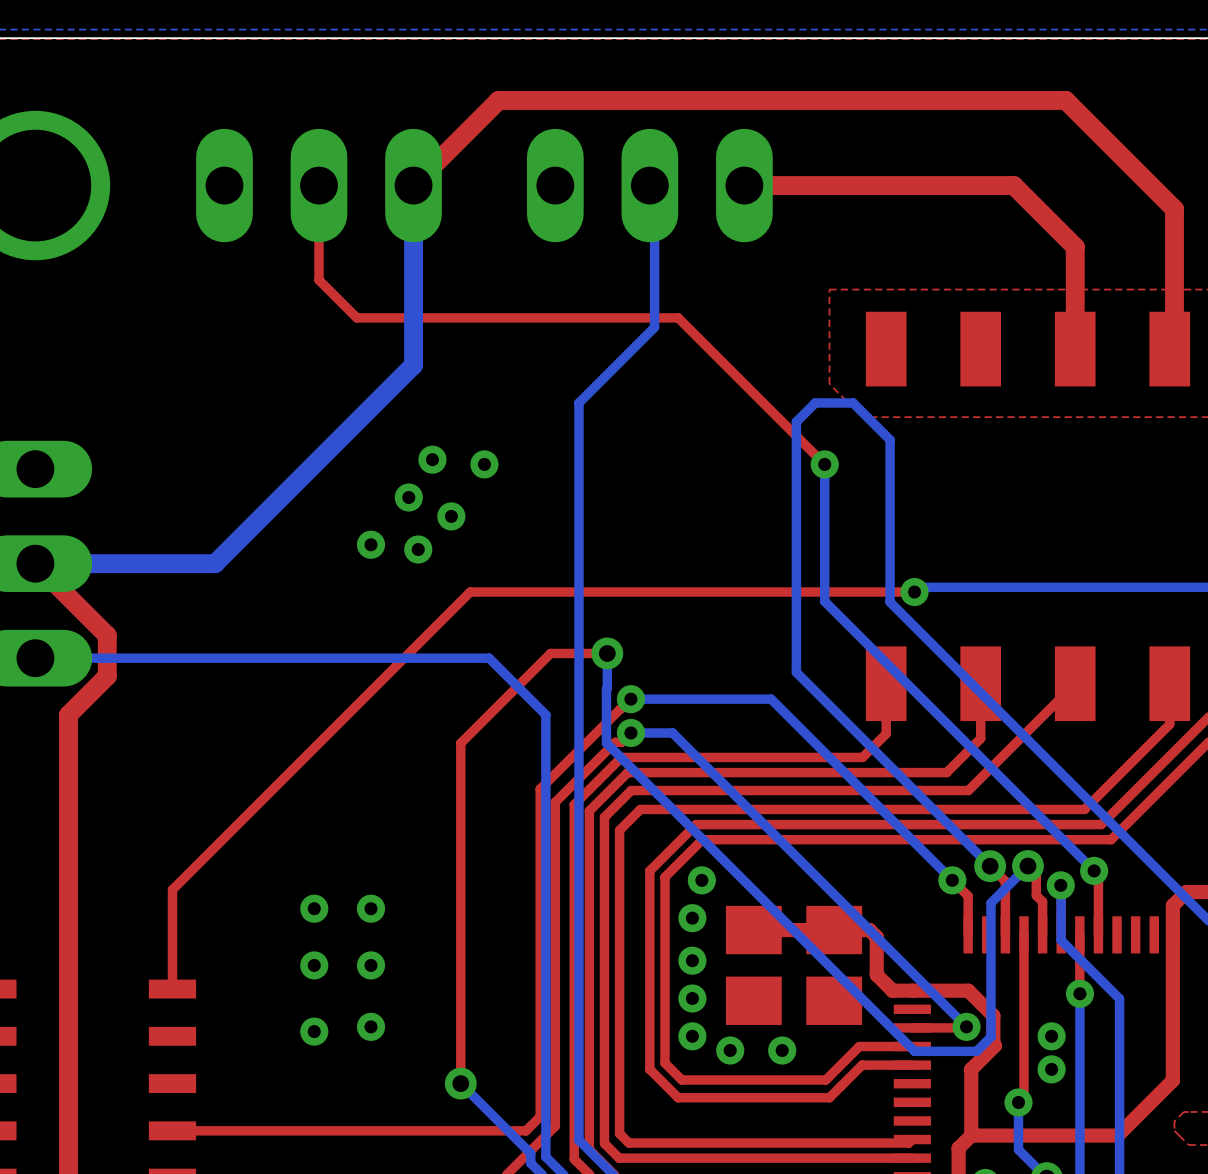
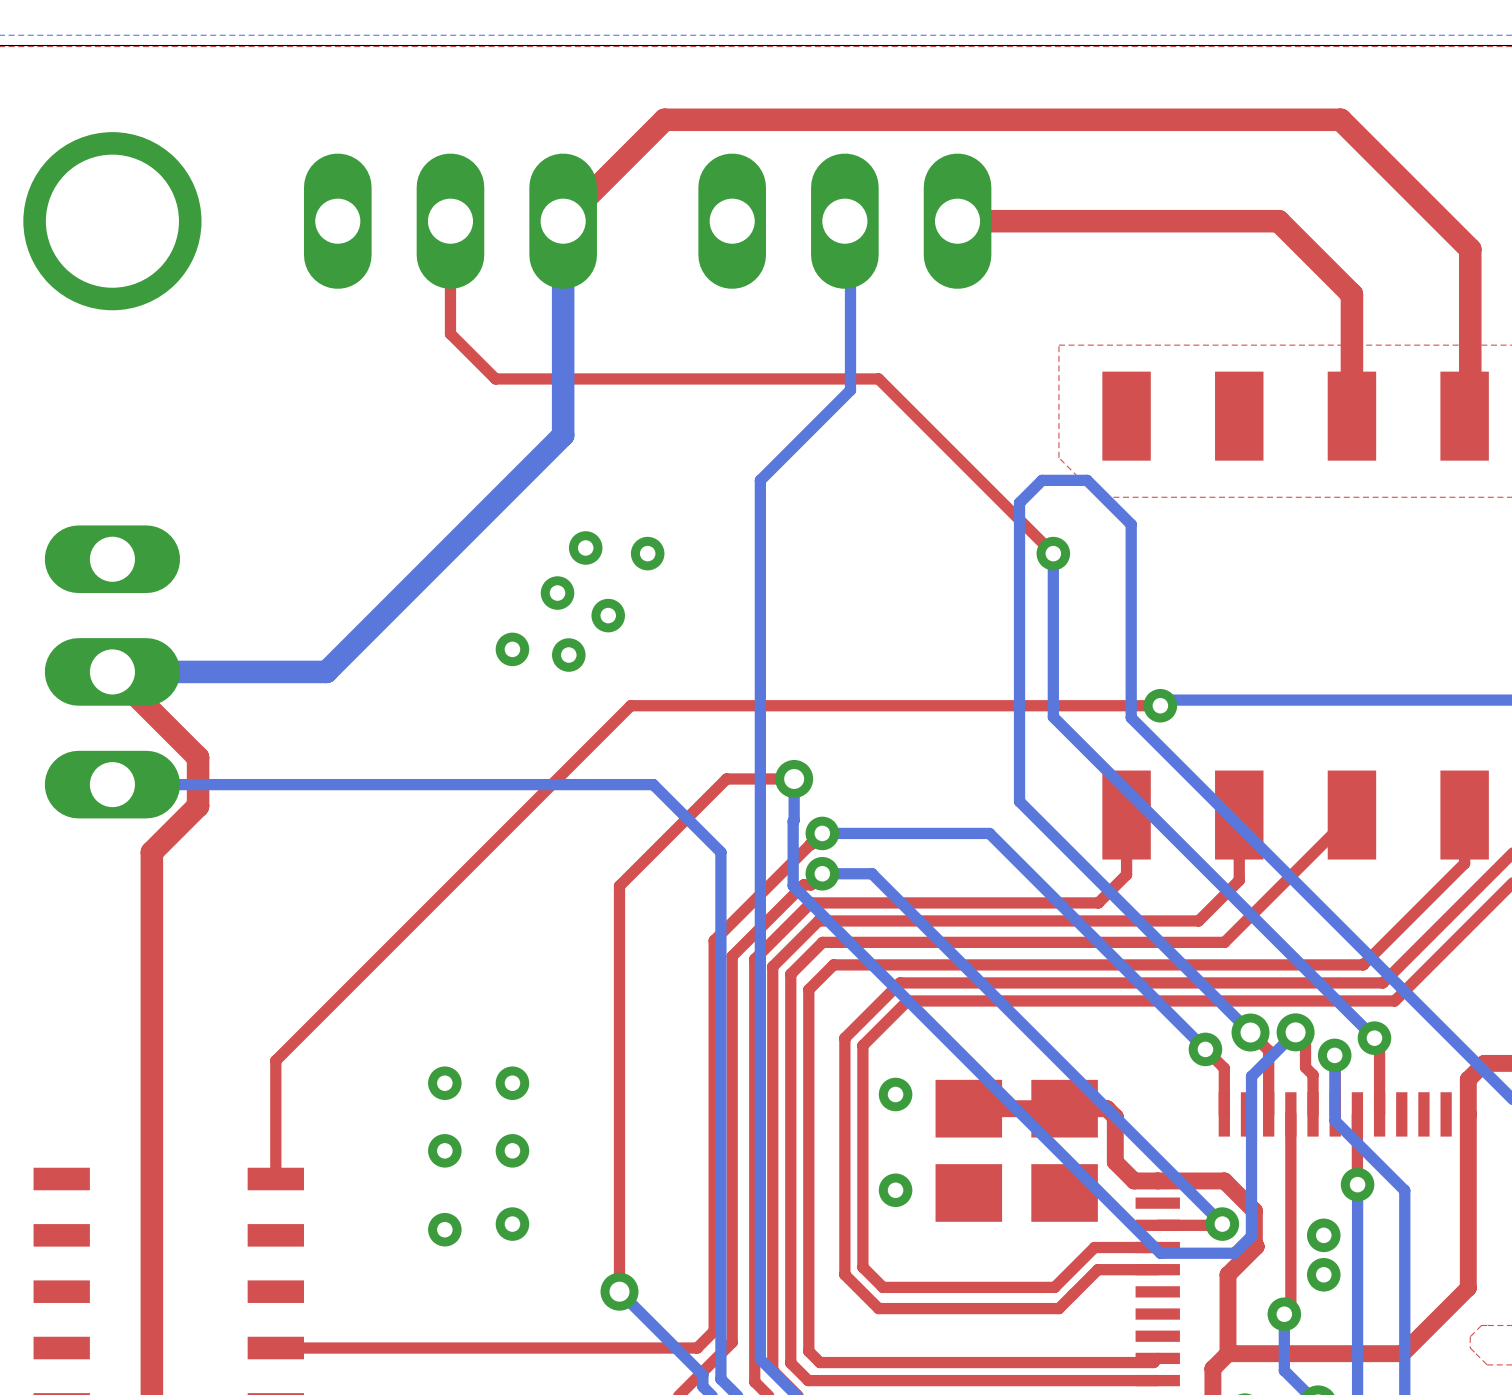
via: (701, 880) -> none
via: (692, 960) -> none
via: (692, 1036) -> none
via: (730, 1050) -> none
via: (782, 1050) -> none

